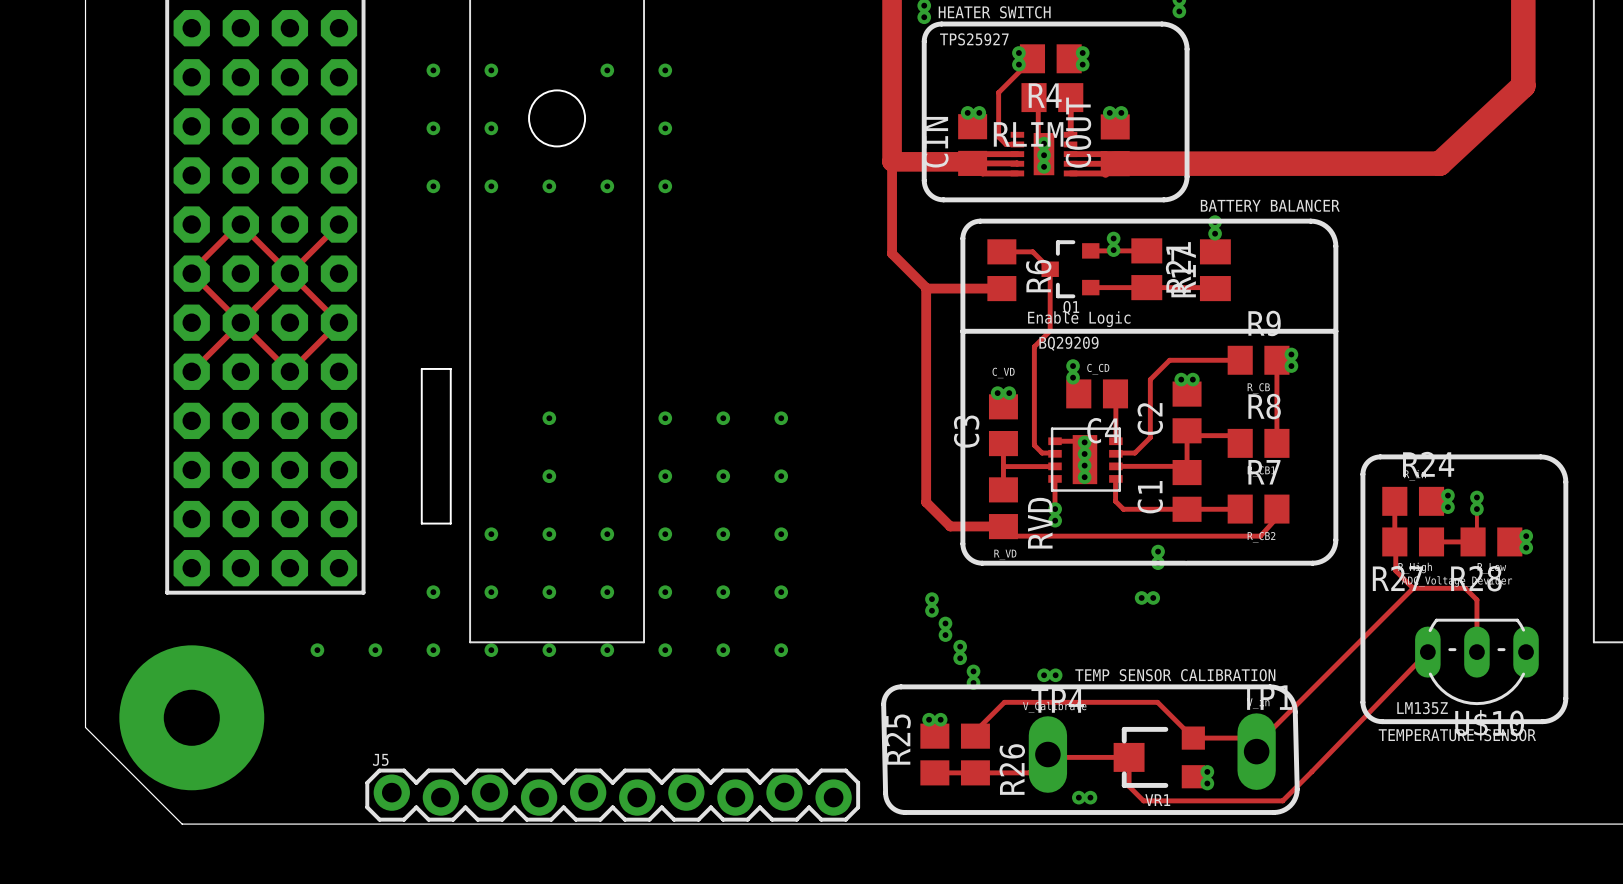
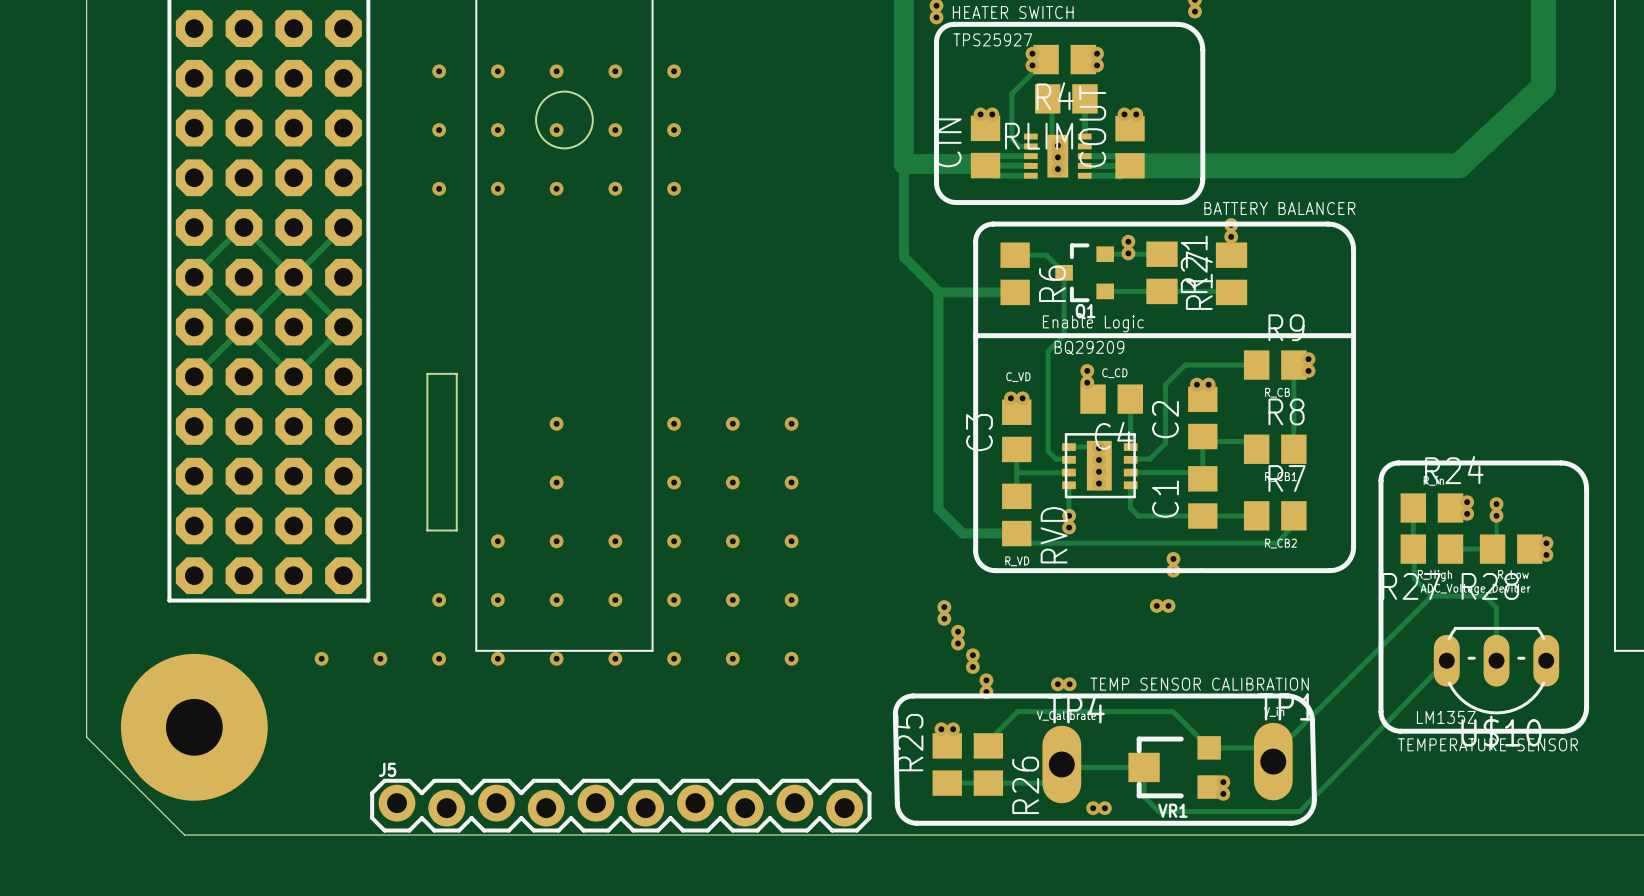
via: none -> (556, 71)
via: none -> (556, 130)
via: none -> (615, 130)

